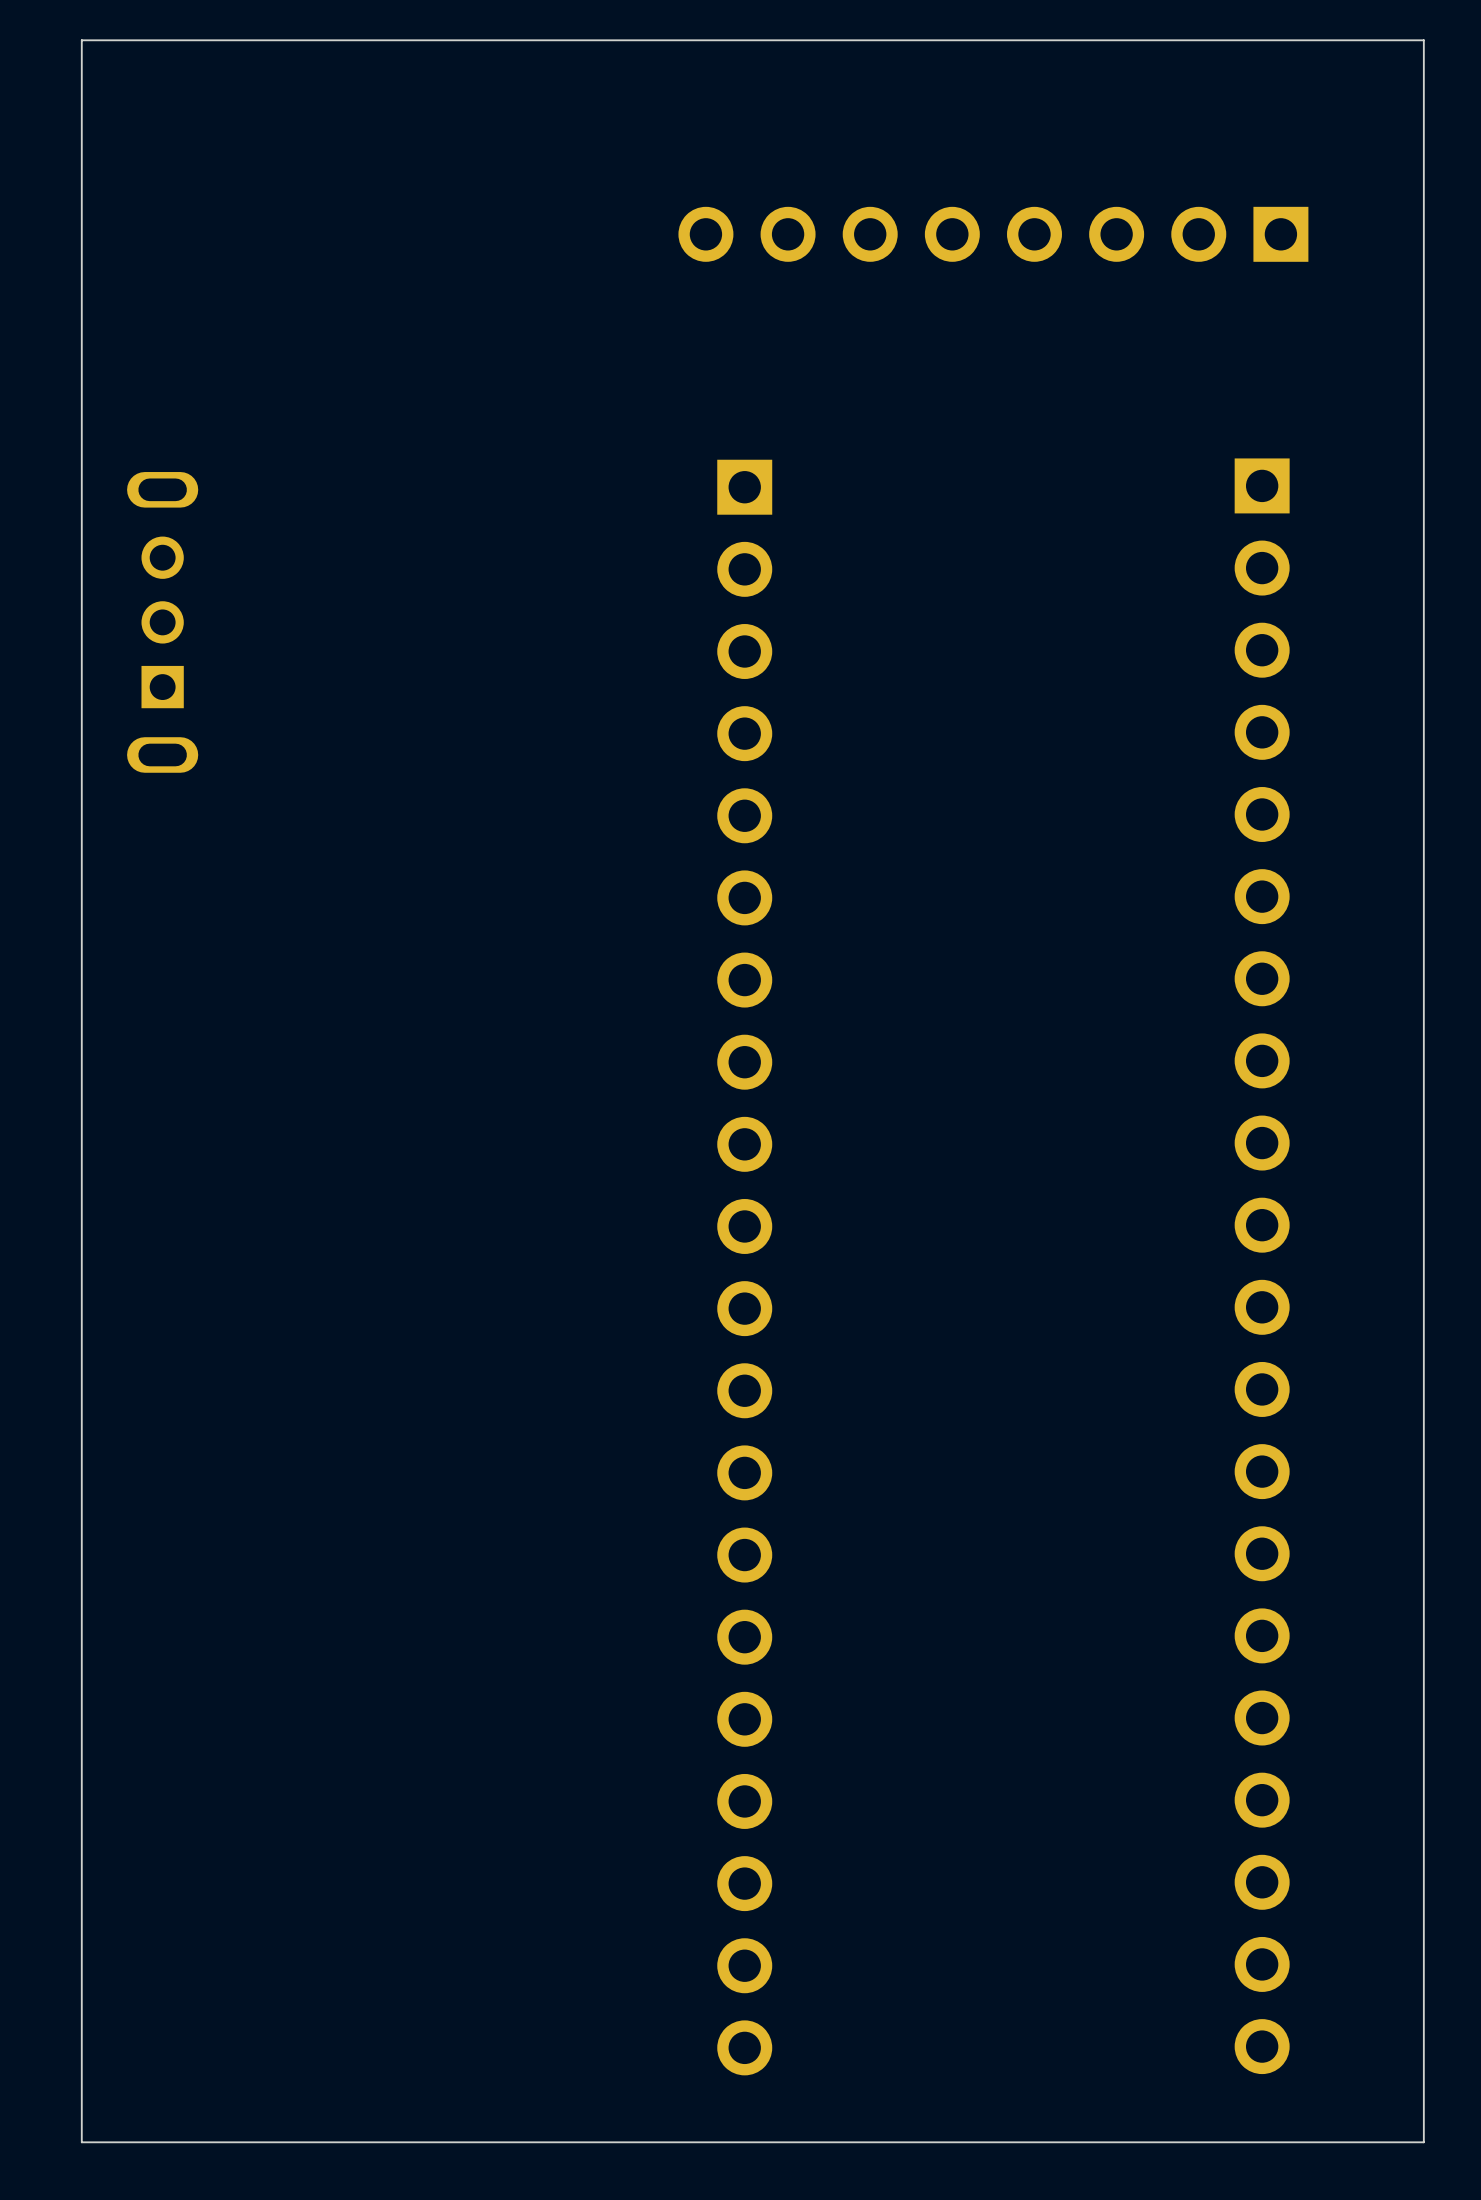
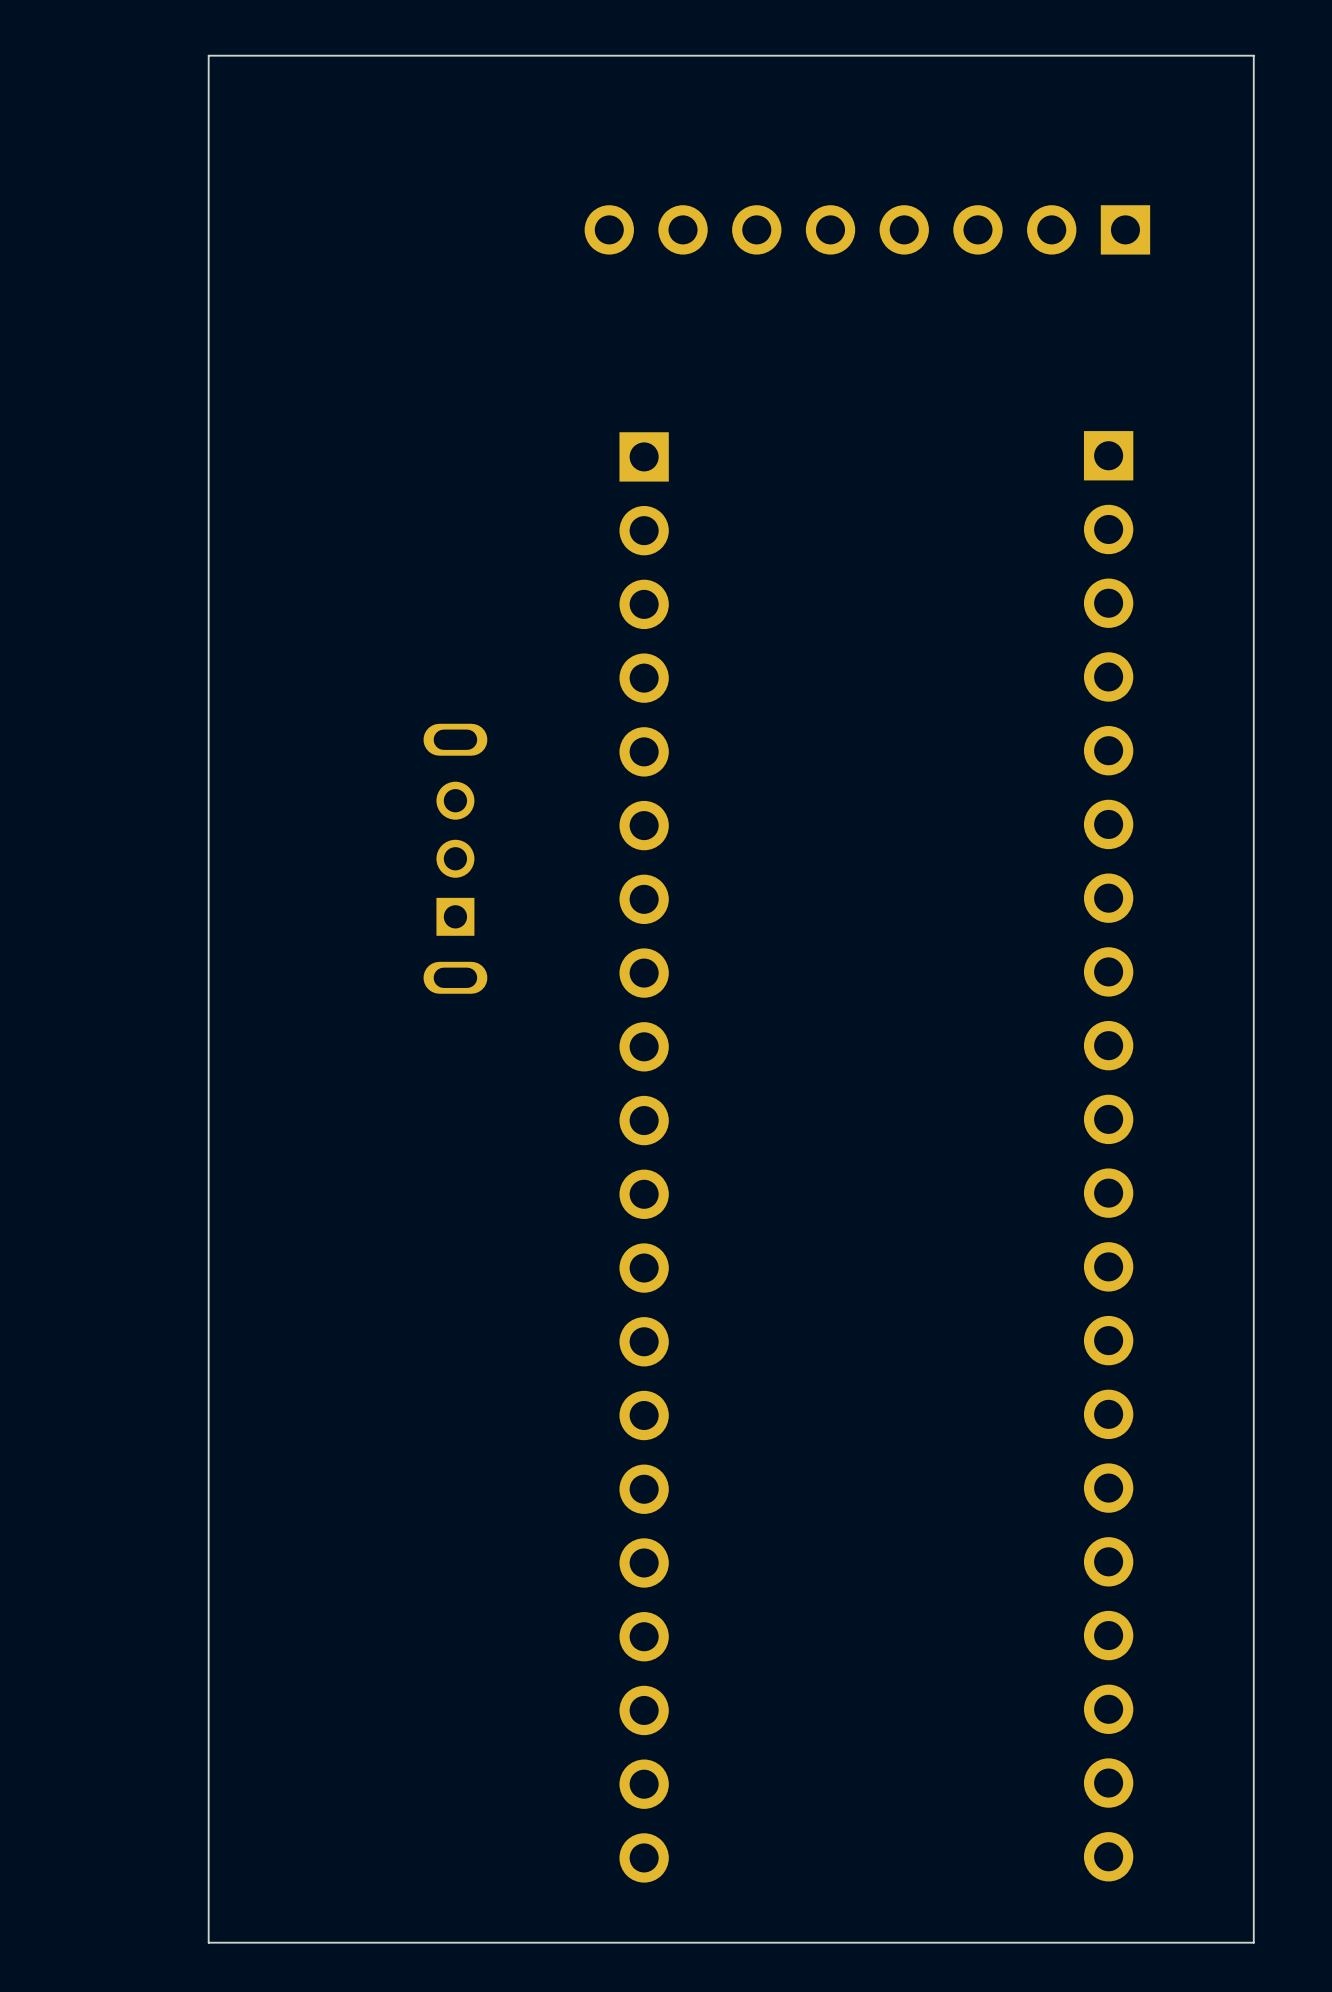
board edge: (259, 40) (81, 40) (81, 2142) (259, 2142) -> (208, 55) (208, 1942)
part position: (162, 622) -> (455, 858)

